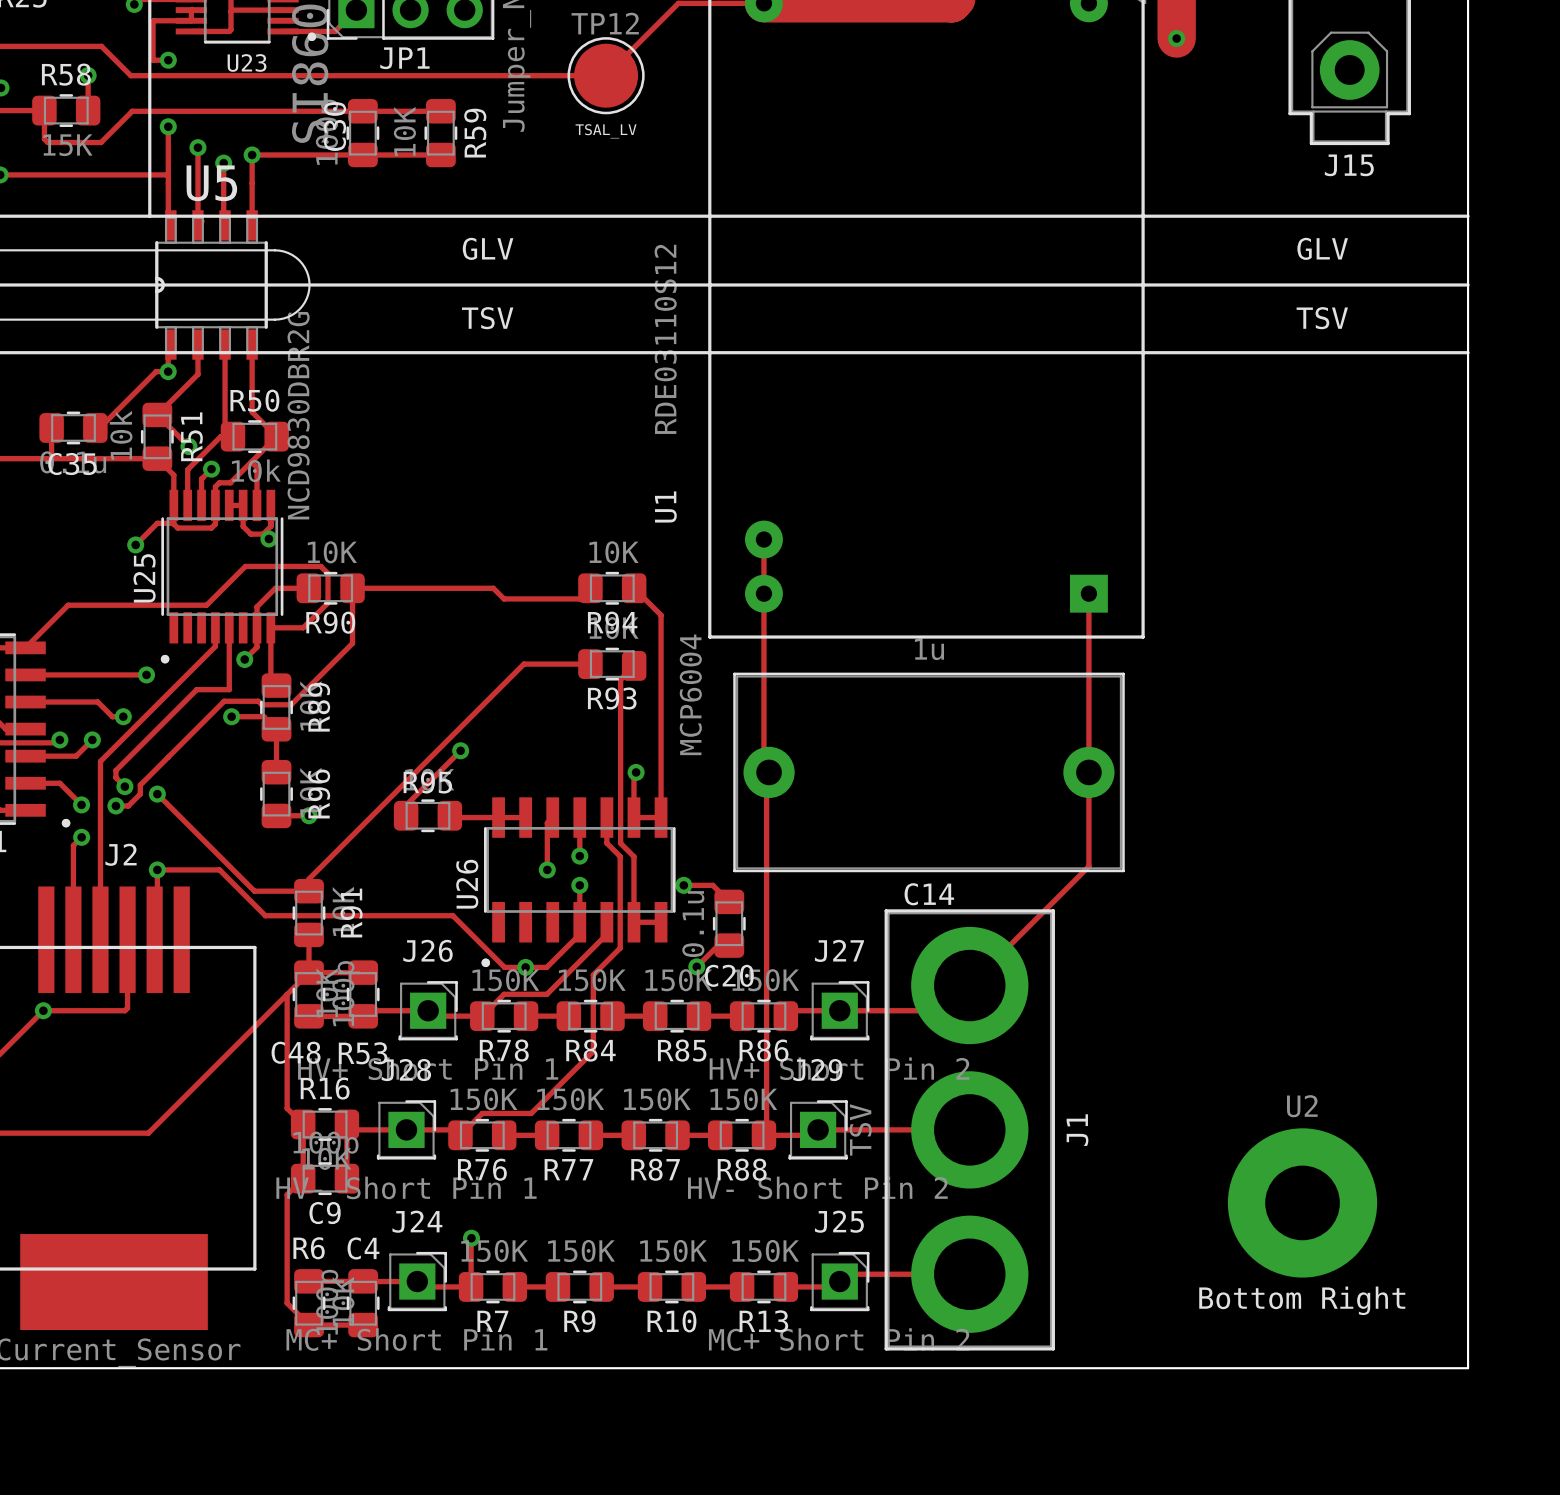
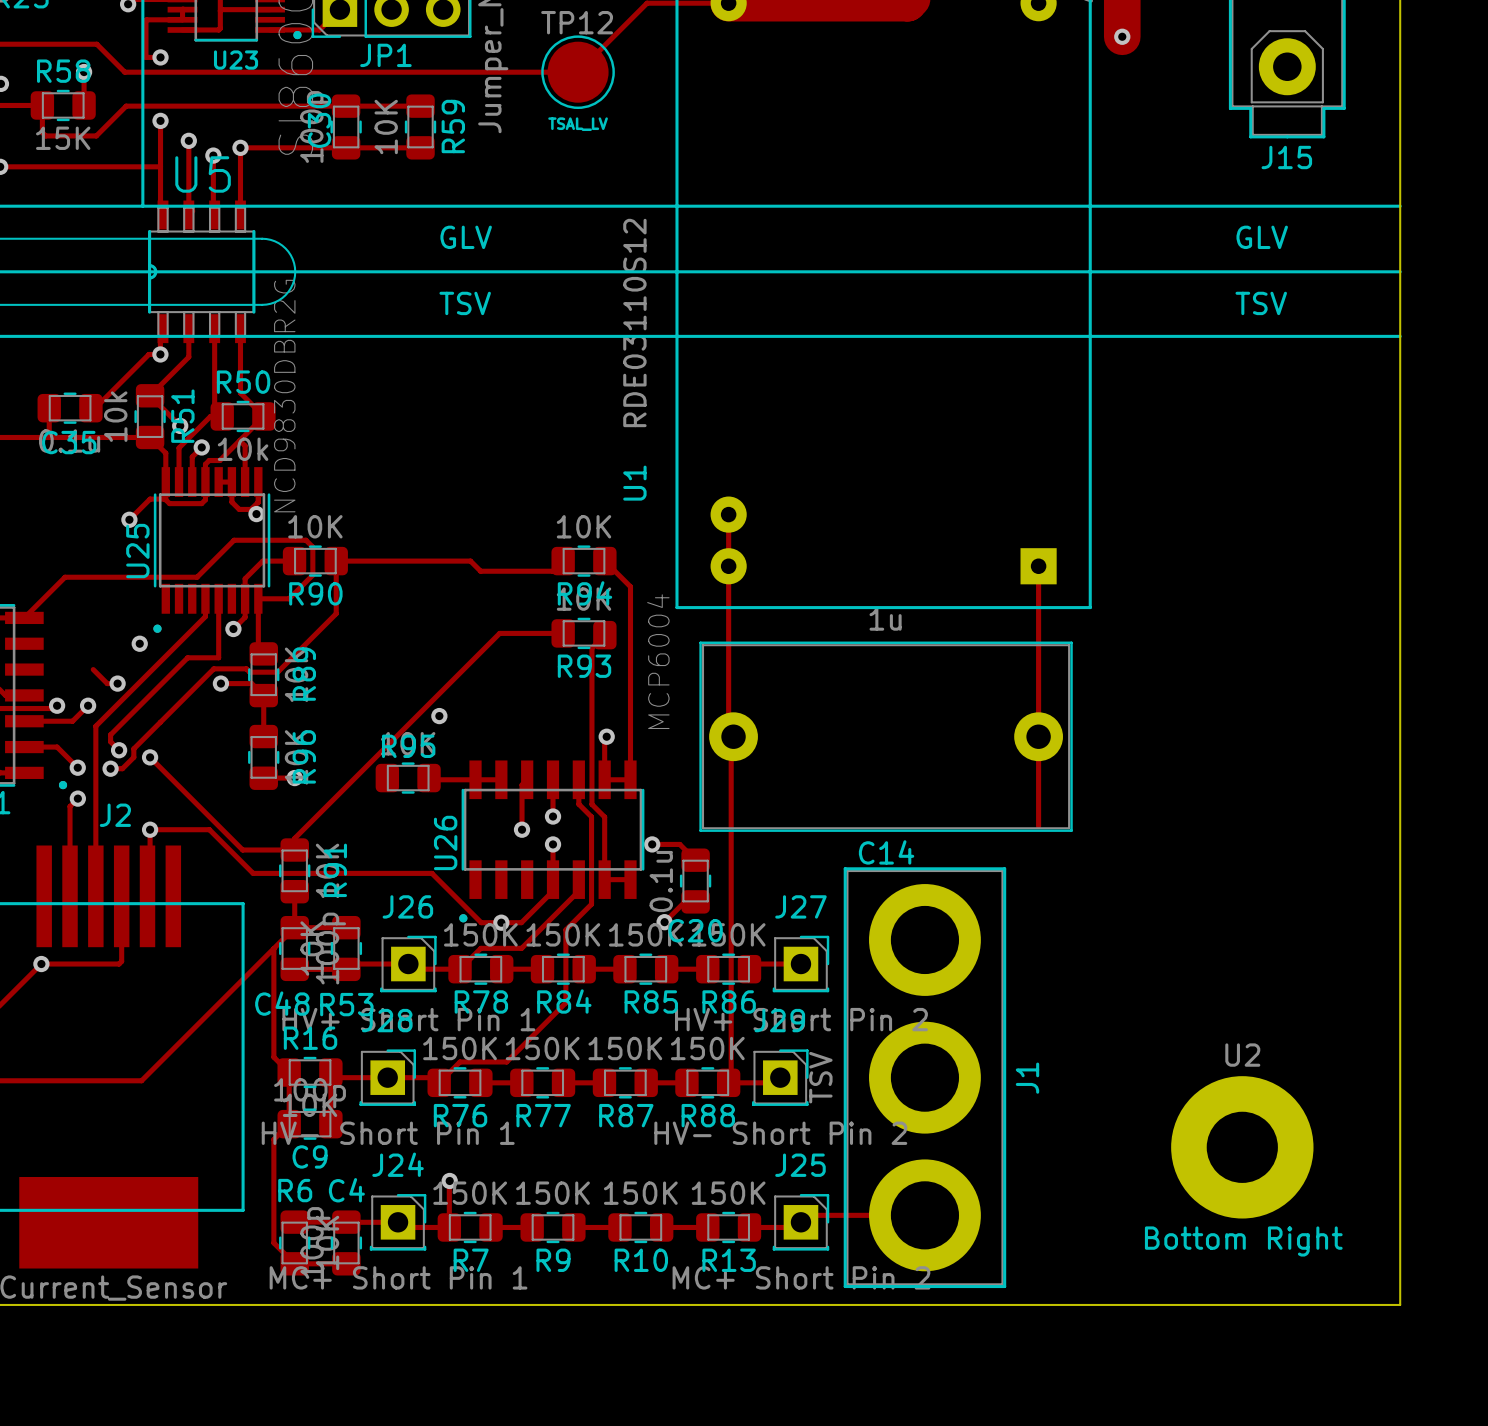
track: (25, 674) (146, 674) -> none
track: (25, 702) (97, 702) -> none
track: (460, 750) (406, 805) (406, 815) -> none
track: (1088, 866) (944, 1010) (839, 1010) -> none
track: (818, 1129) (969, 1129) -> none

